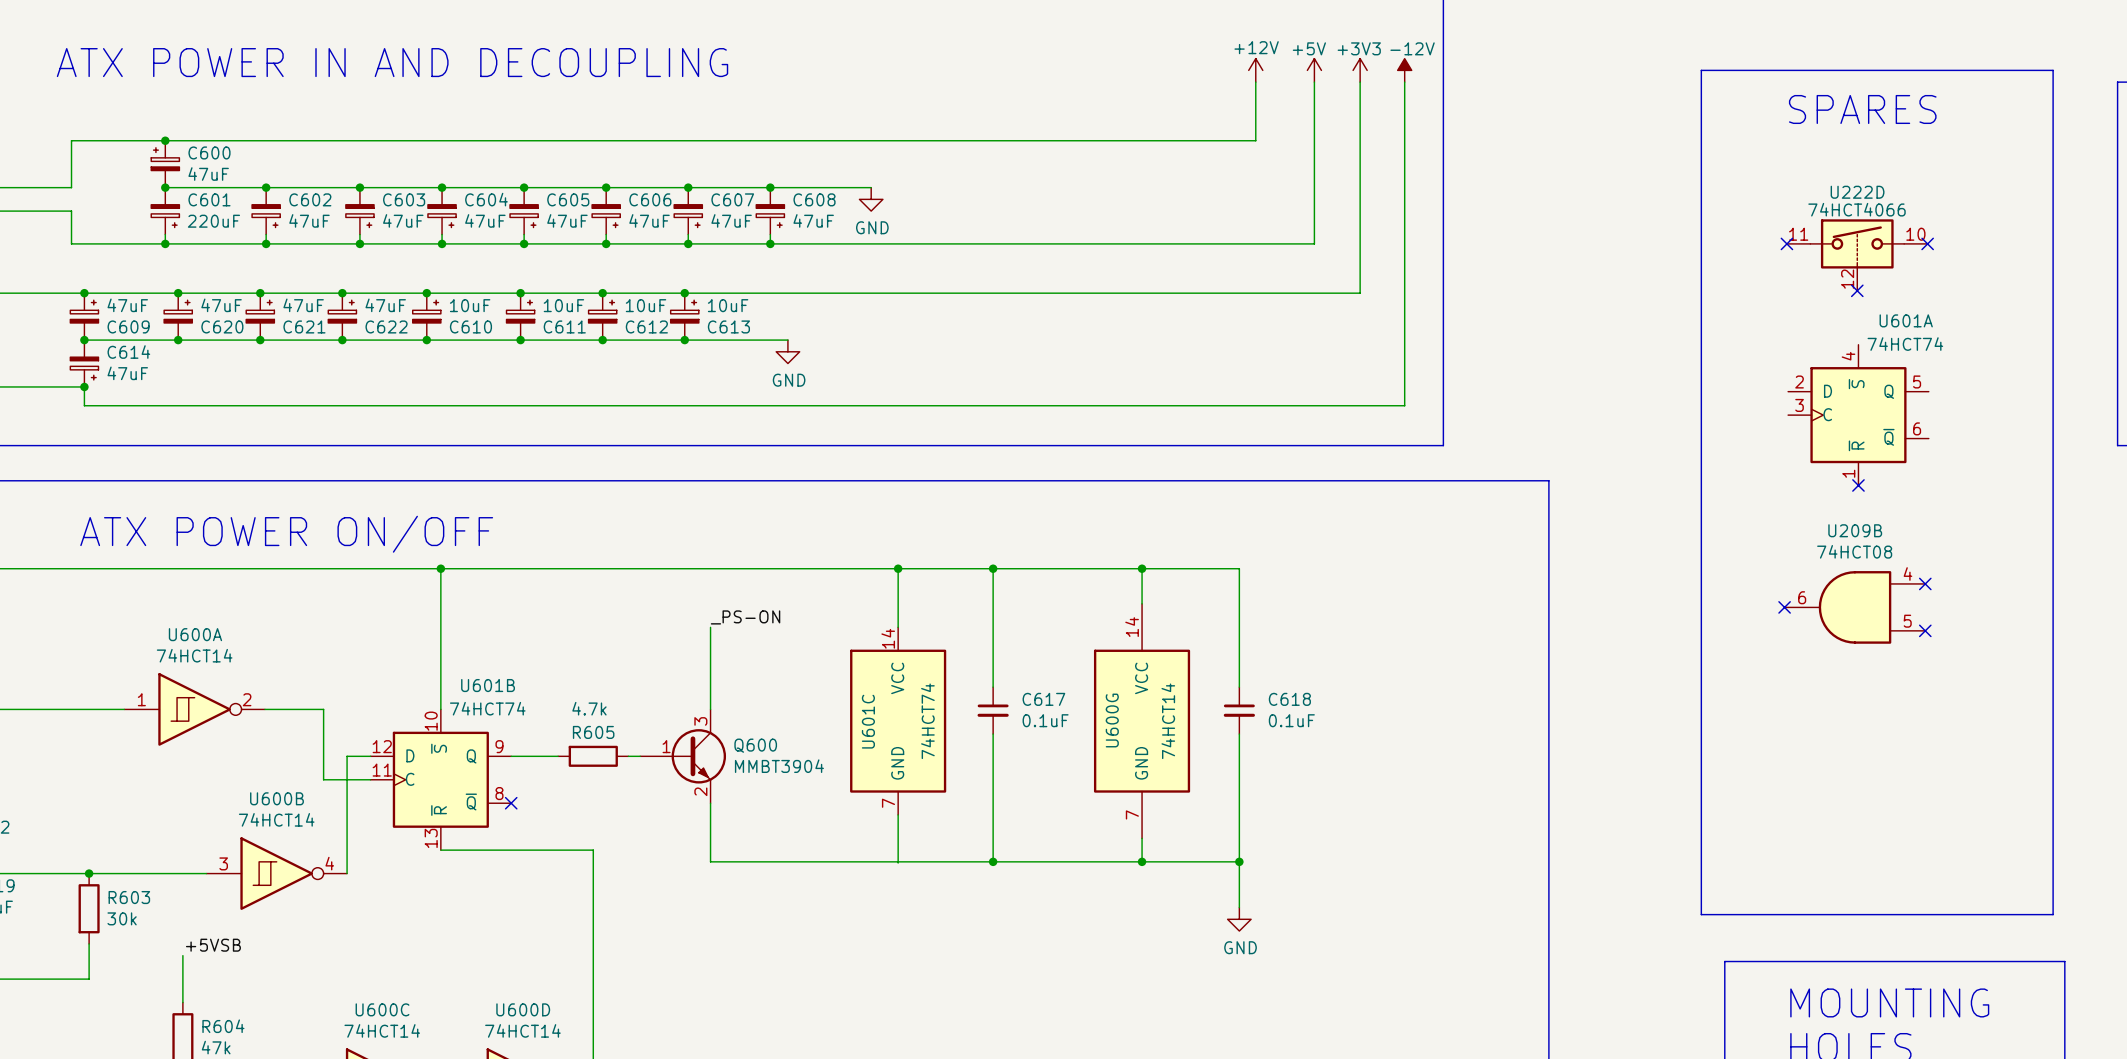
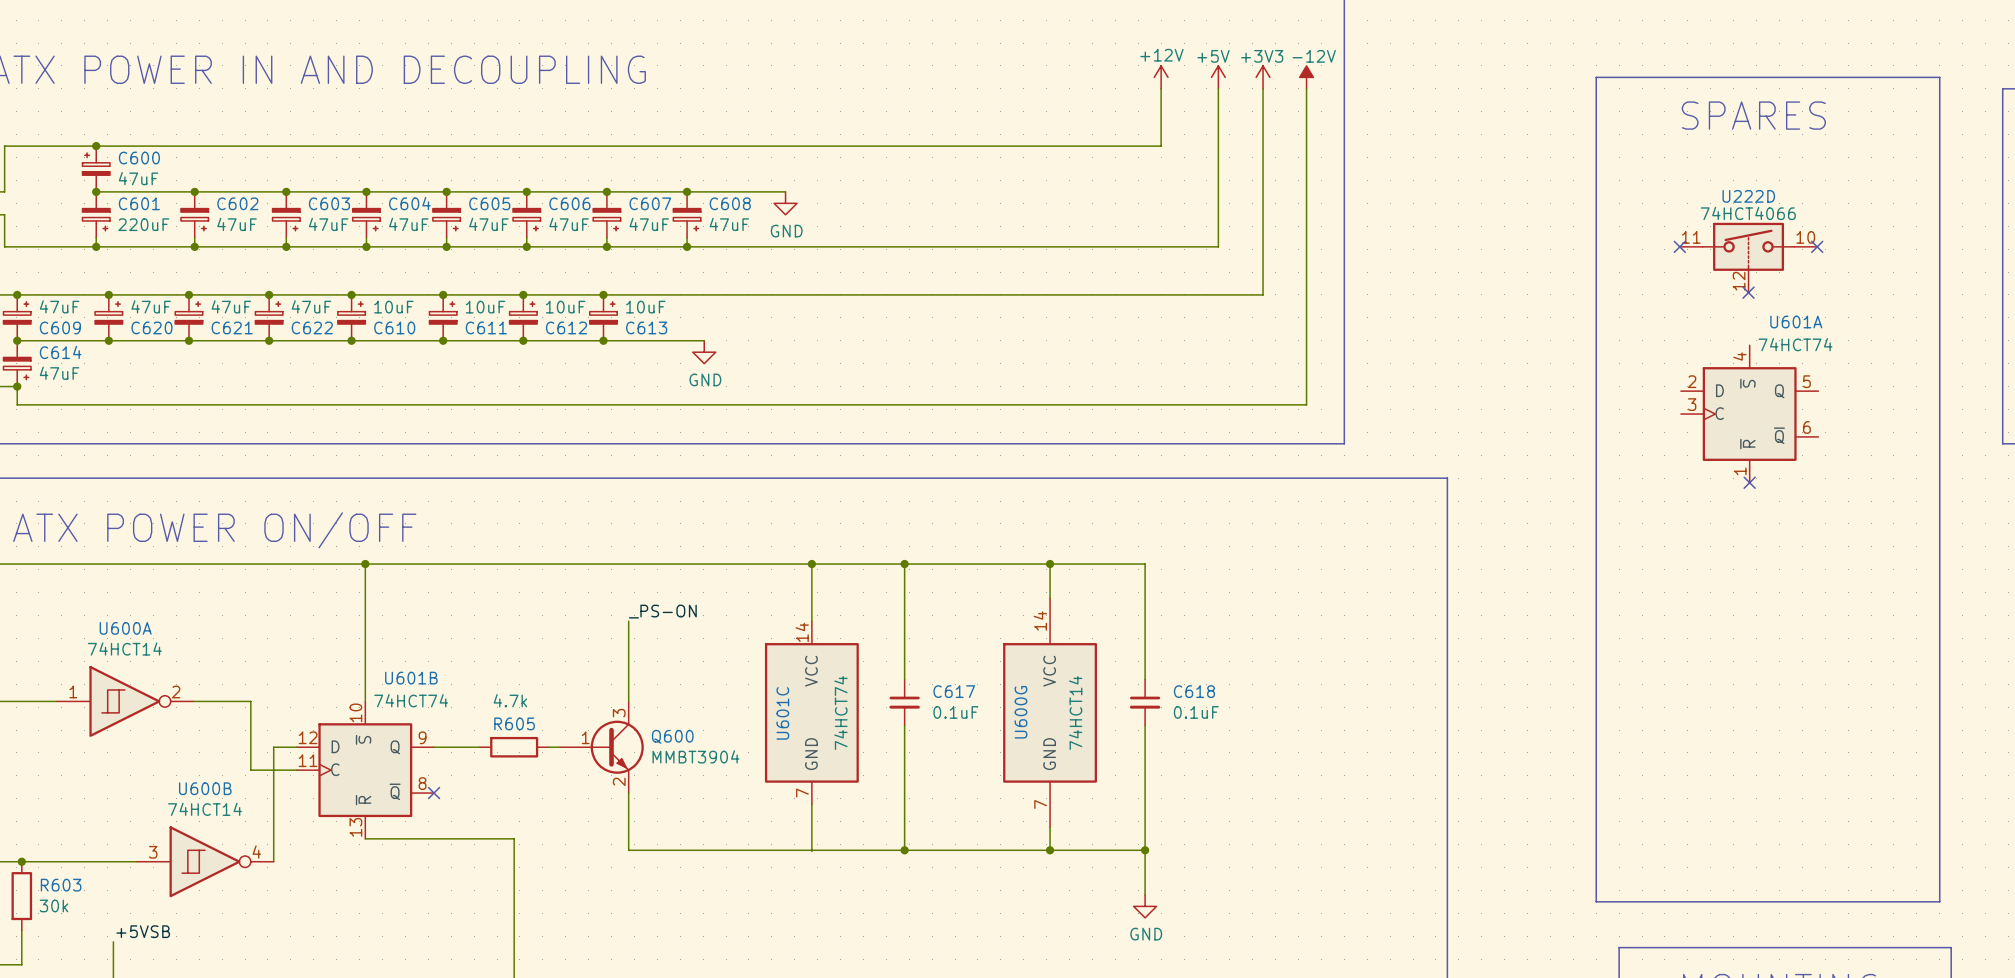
no-connect mark: (1925, 583) -> none
no-connect mark: (1784, 607) -> none
U209B: 74HCT08 (1854, 607) -> none
no-connect mark: (1925, 630) -> none

